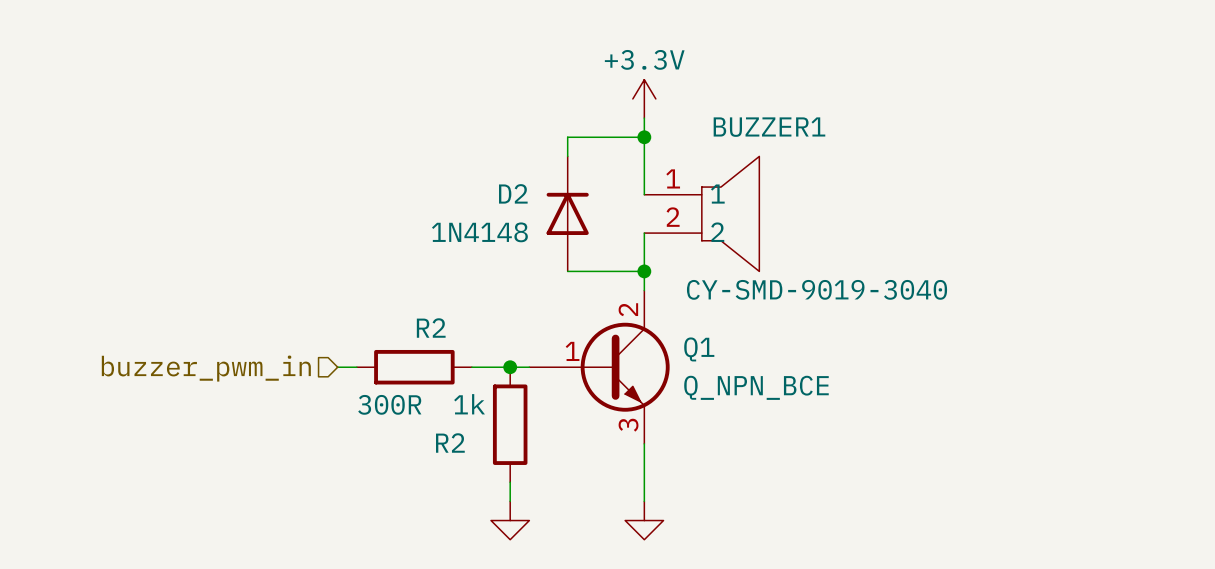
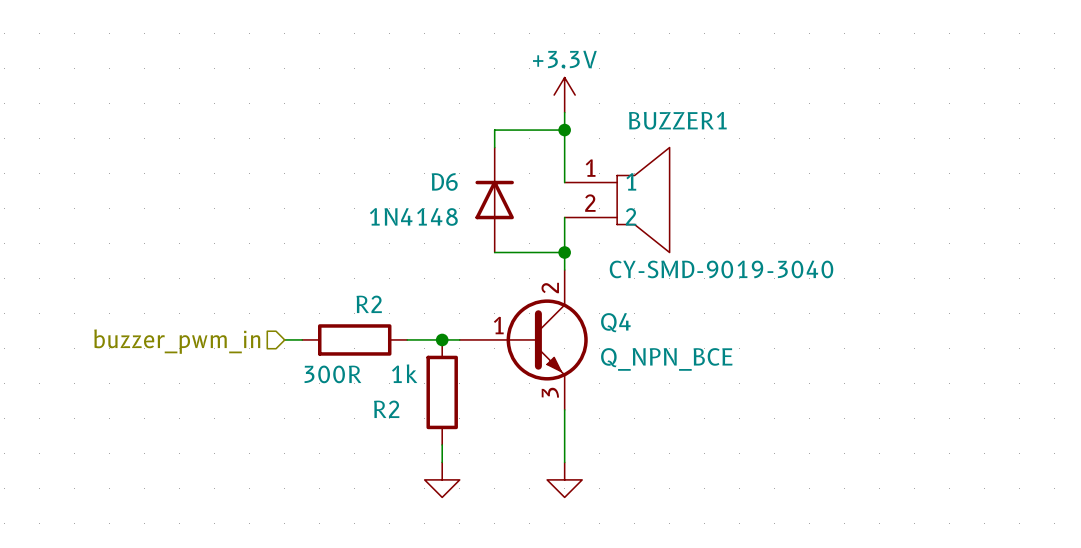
D2 name: D2 (513, 193) -> D6 (444, 181)
Q1 name: Q1 (699, 349) -> Q4 (615, 322)

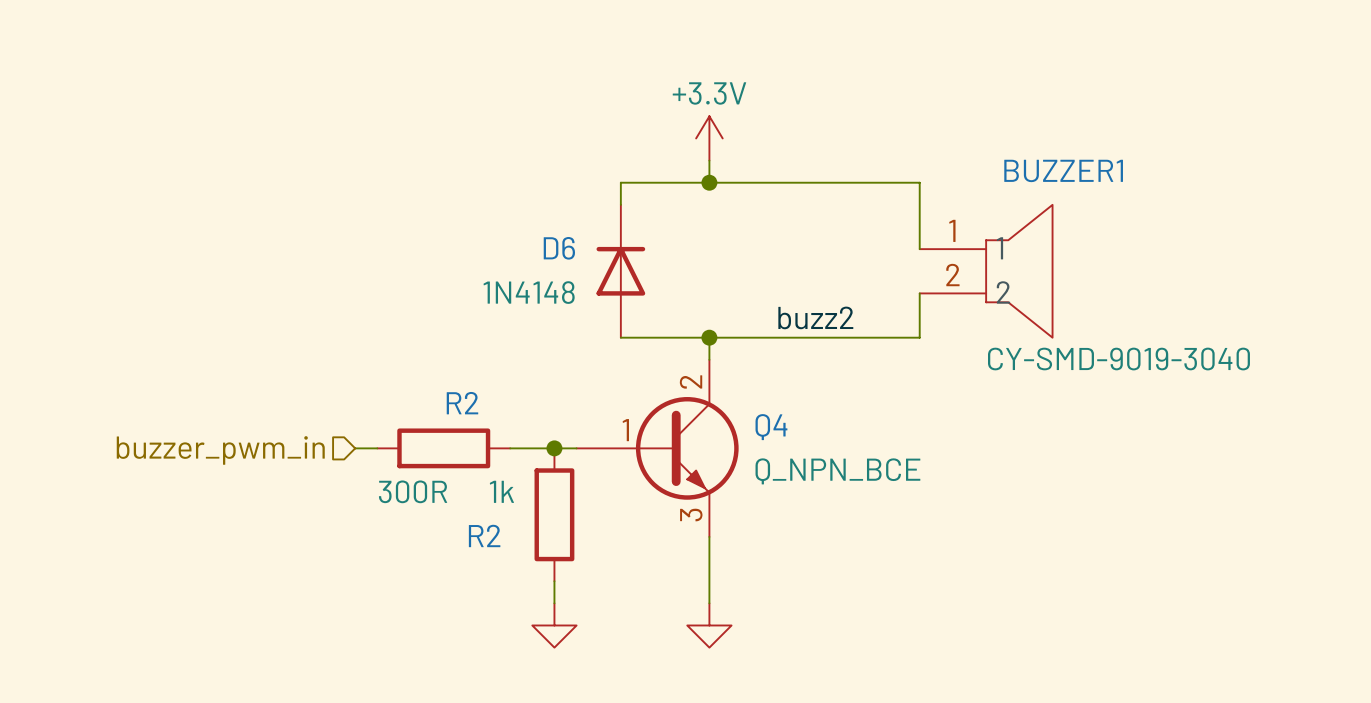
wire: (564, 130) (564, 182) -> (709, 182) (919, 182) (919, 249)
BUZZER1 position: (617, 200) -> (986, 271)
wire: (564, 217) (564, 252) -> (919, 293) (919, 337) (709, 337)
label: none -> buzz2 (815, 317)

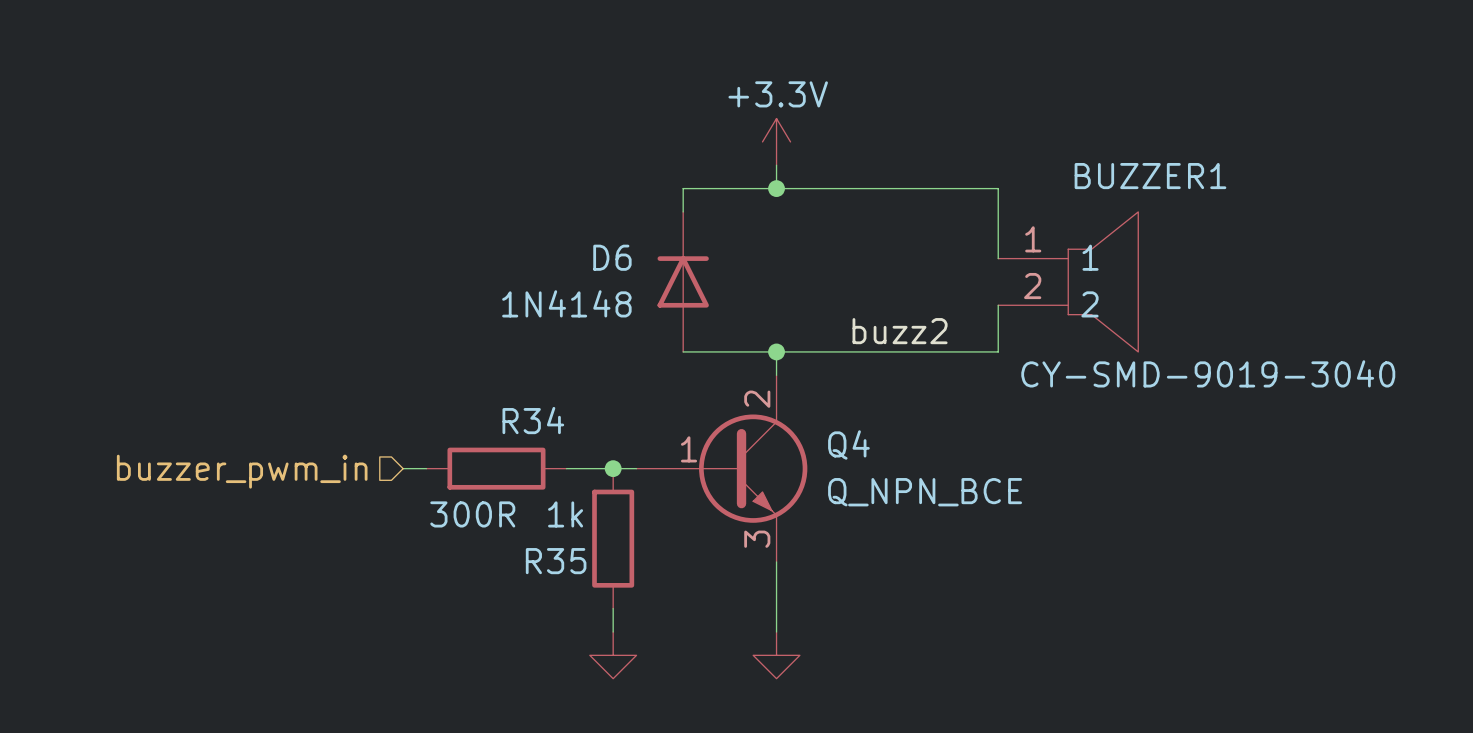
R2 name: R2 (462, 403) -> R34 (533, 420)
R2 name: R2 (484, 535) -> R35 (556, 561)

